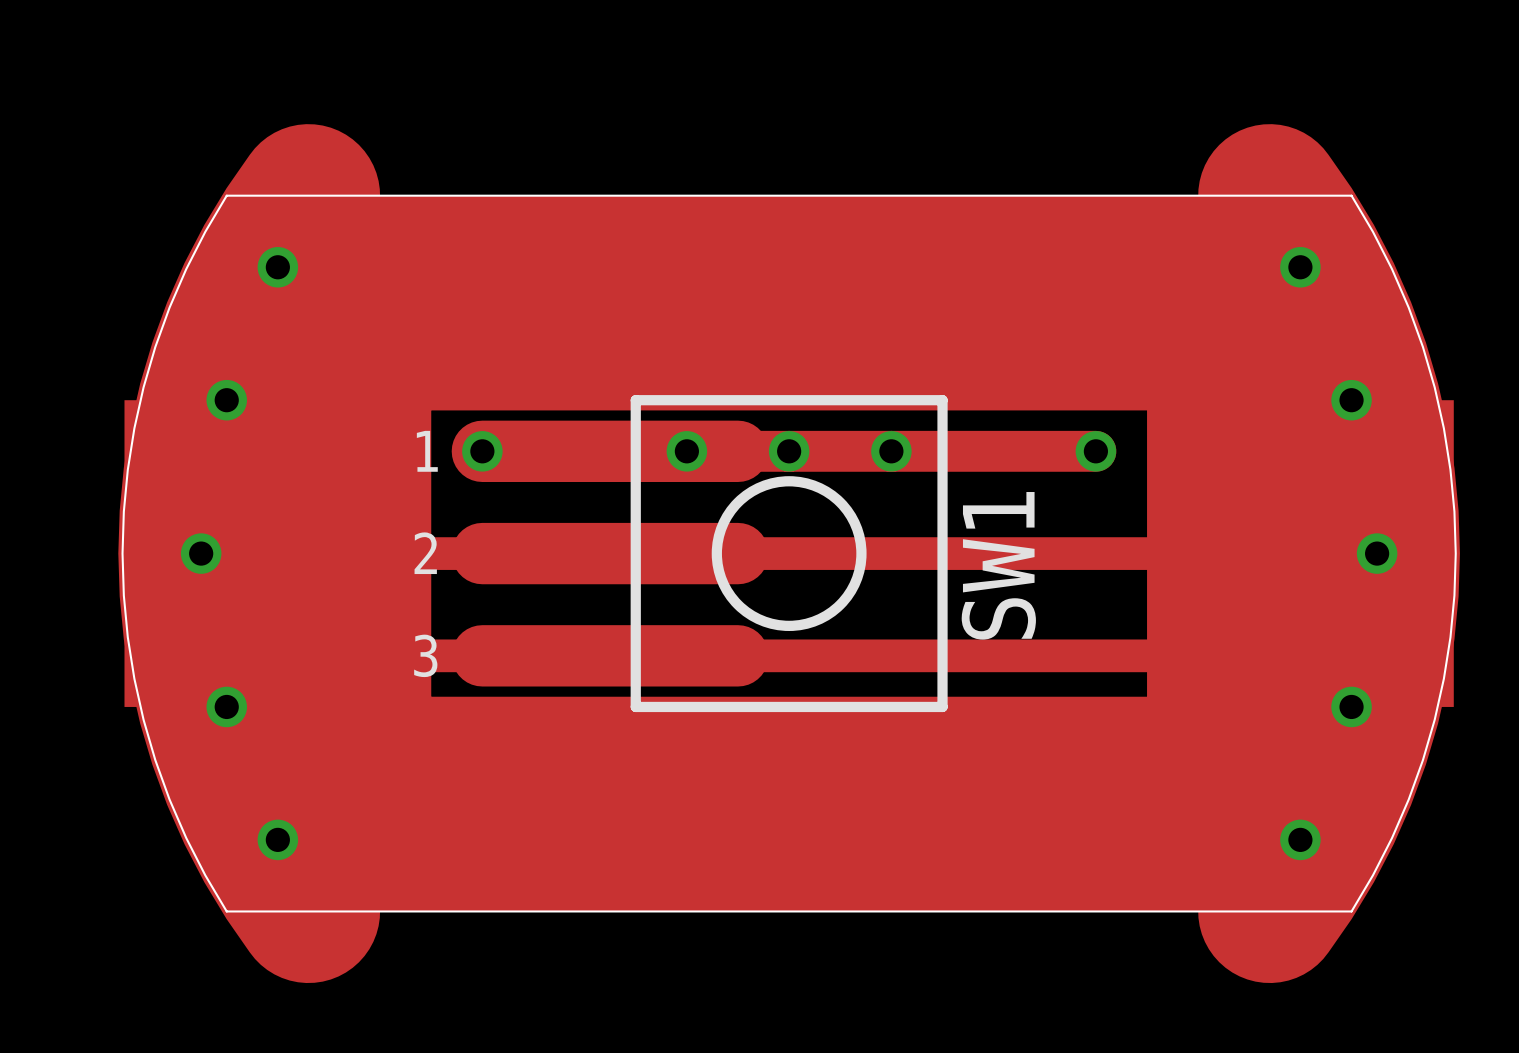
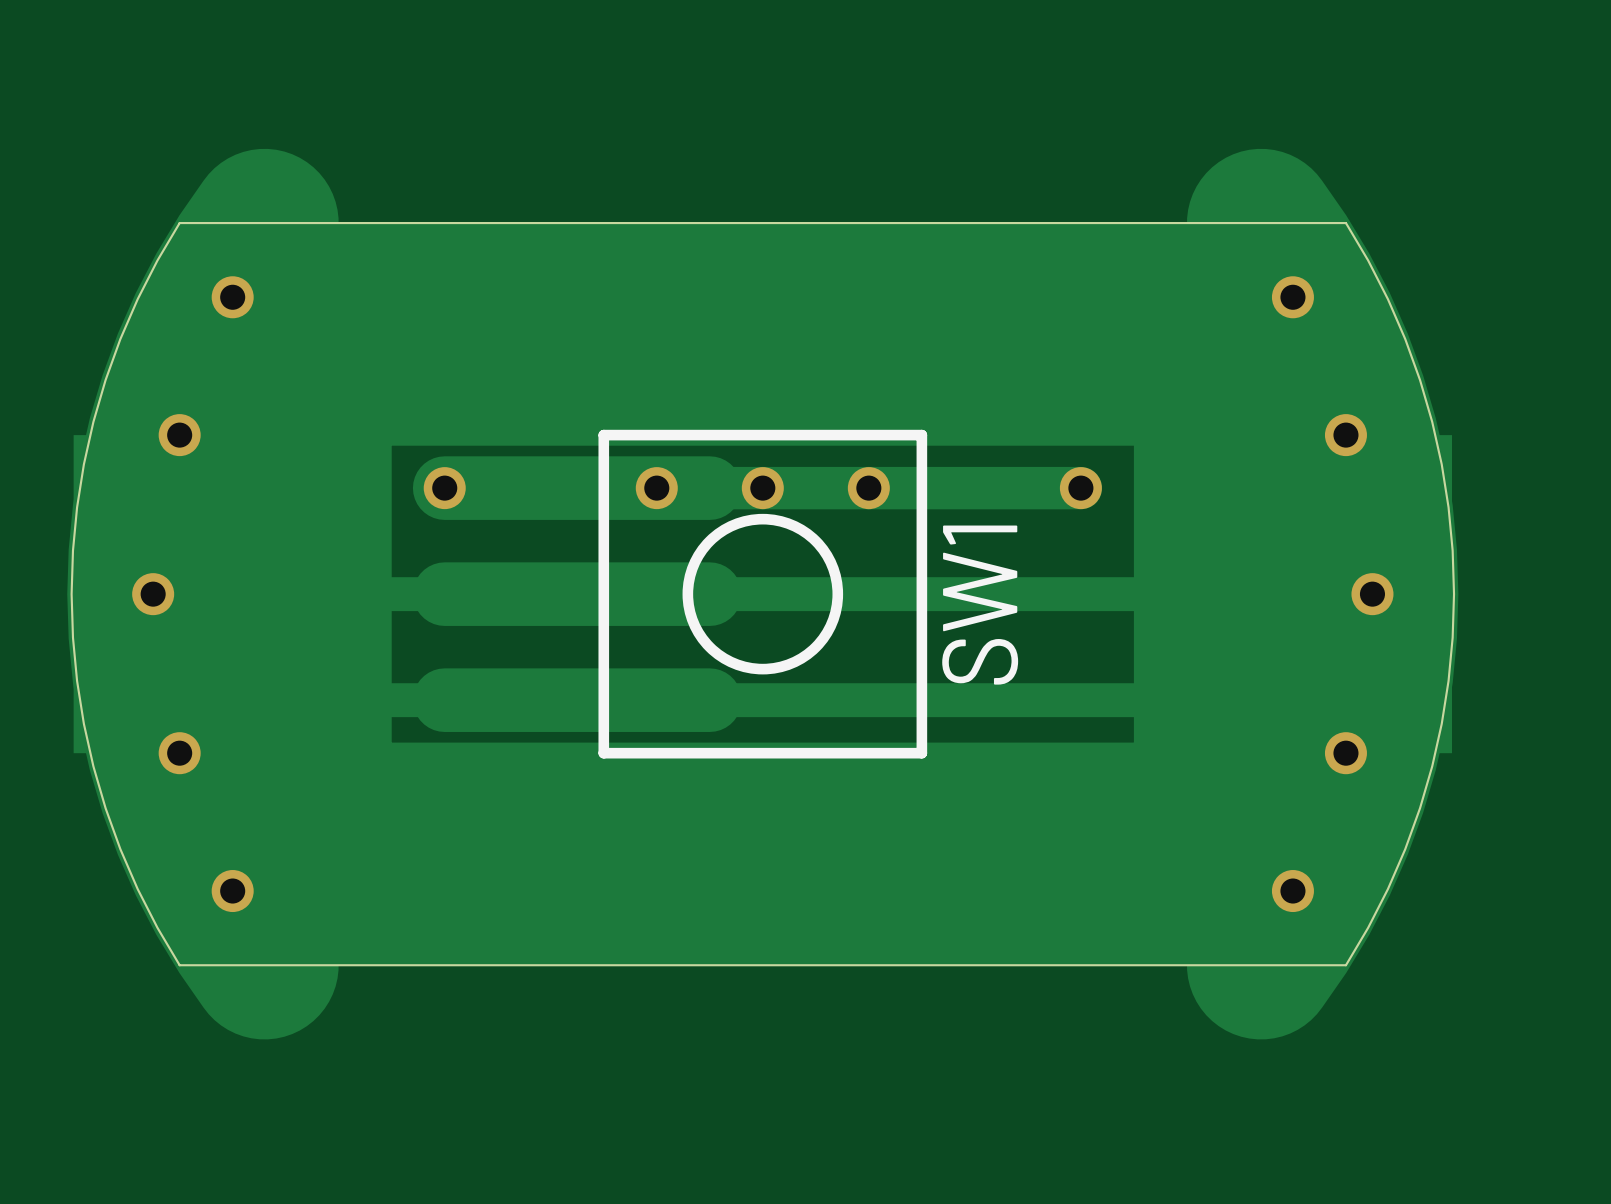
text: 1 (427, 451) -> none
text: 2 (425, 553) -> none
text: 3 (425, 655) -> none

